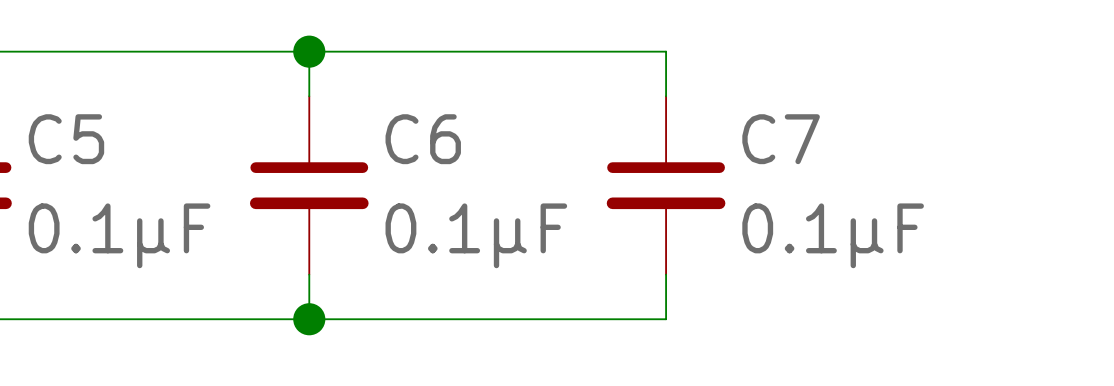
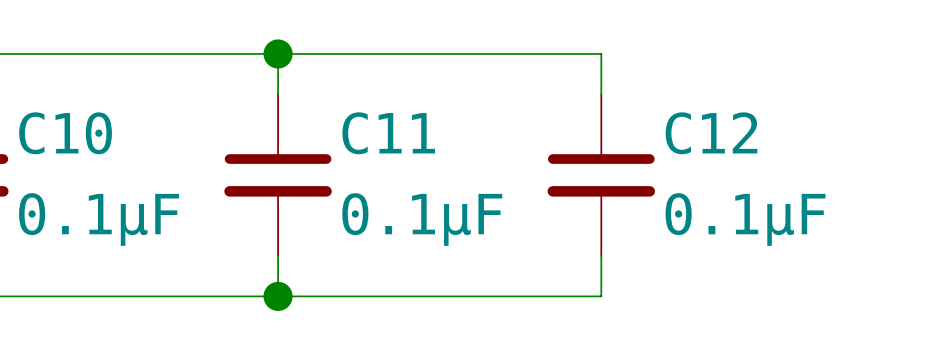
C5 name: C5 (66, 139) -> C10 (65, 133)
C6 name: C6 (423, 139) -> C11 (388, 133)
C7 name: C7 (781, 139) -> C12 (711, 133)

